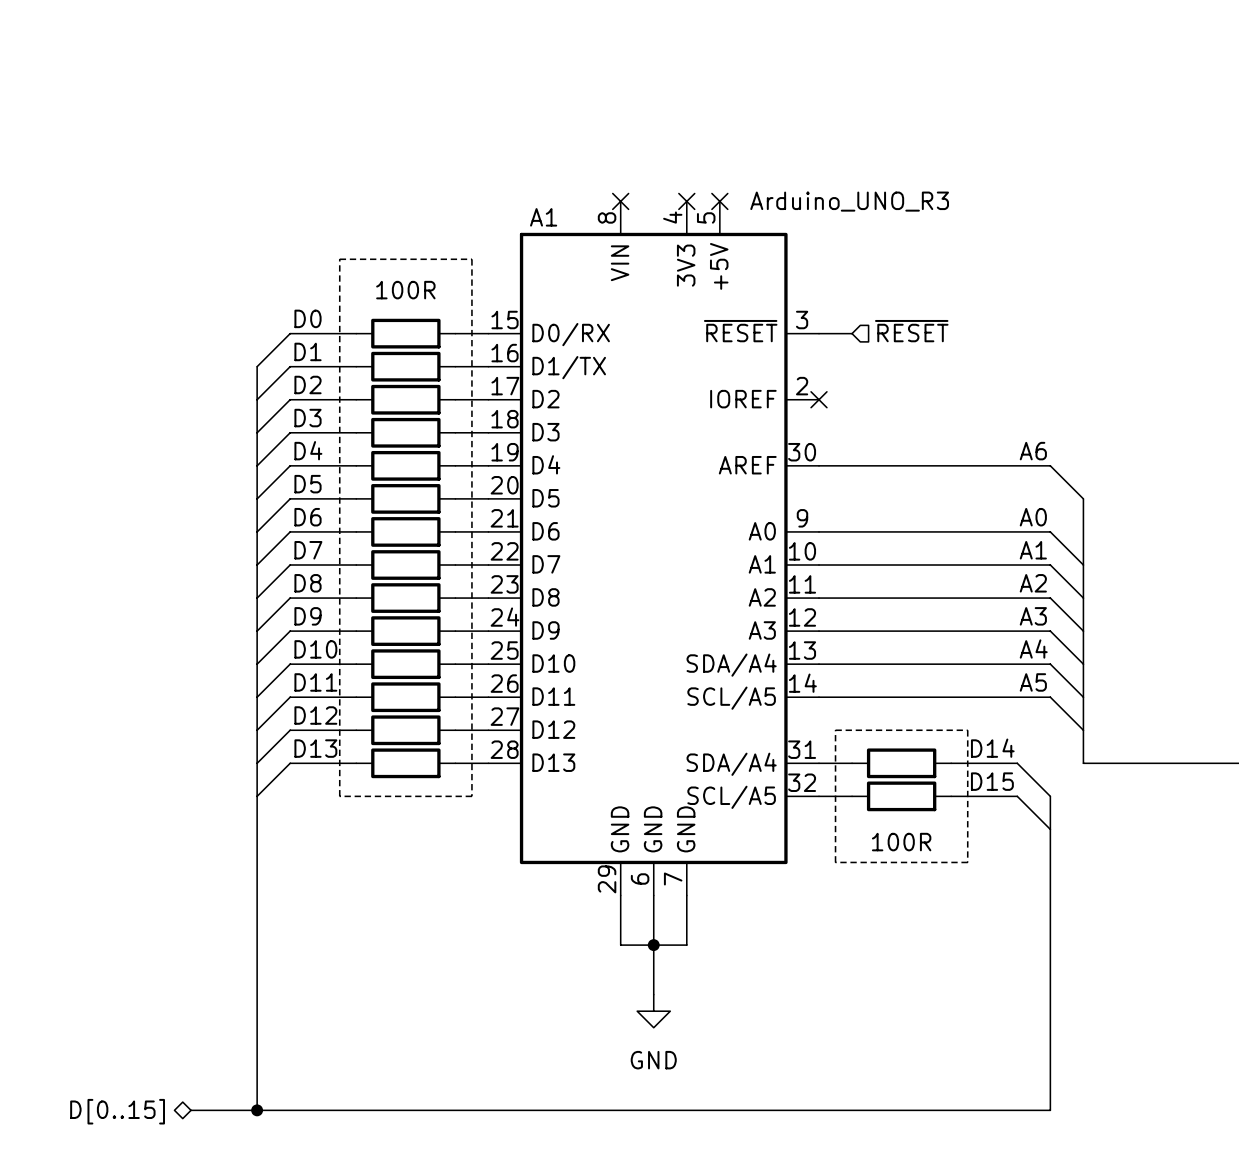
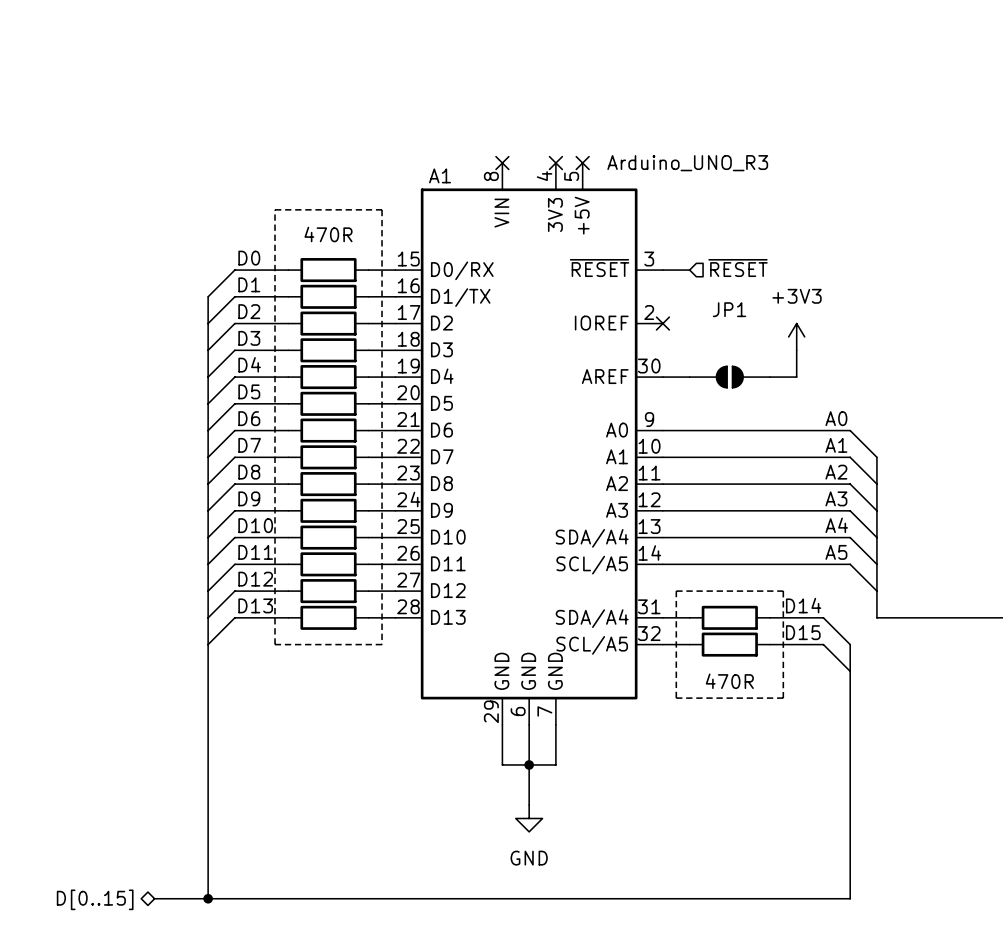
text: 100R (405, 290) -> 470R (328, 234)
power symbol: none -> +3V3 (796, 336)
label: A6 (1033, 451) -> none
JP1: none -> (729, 377)
wire: (984, 465) (1050, 465) (1083, 498) -> (796, 377) (796, 350)
bus: (1083, 498) (1083, 565) -> none
text: 100R (901, 842) -> 470R (729, 681)

